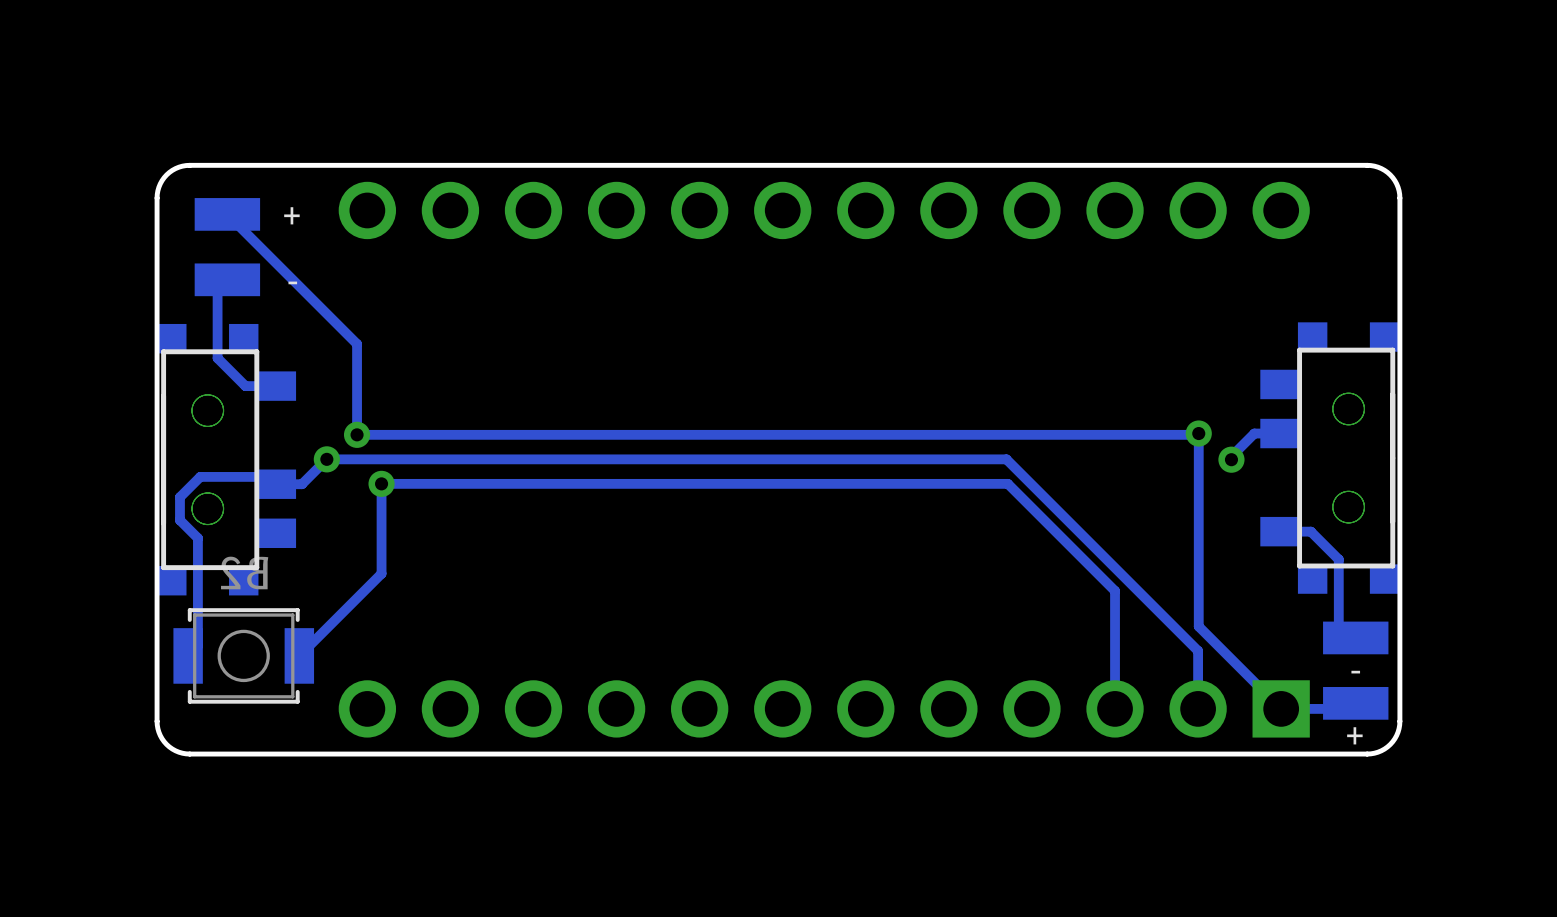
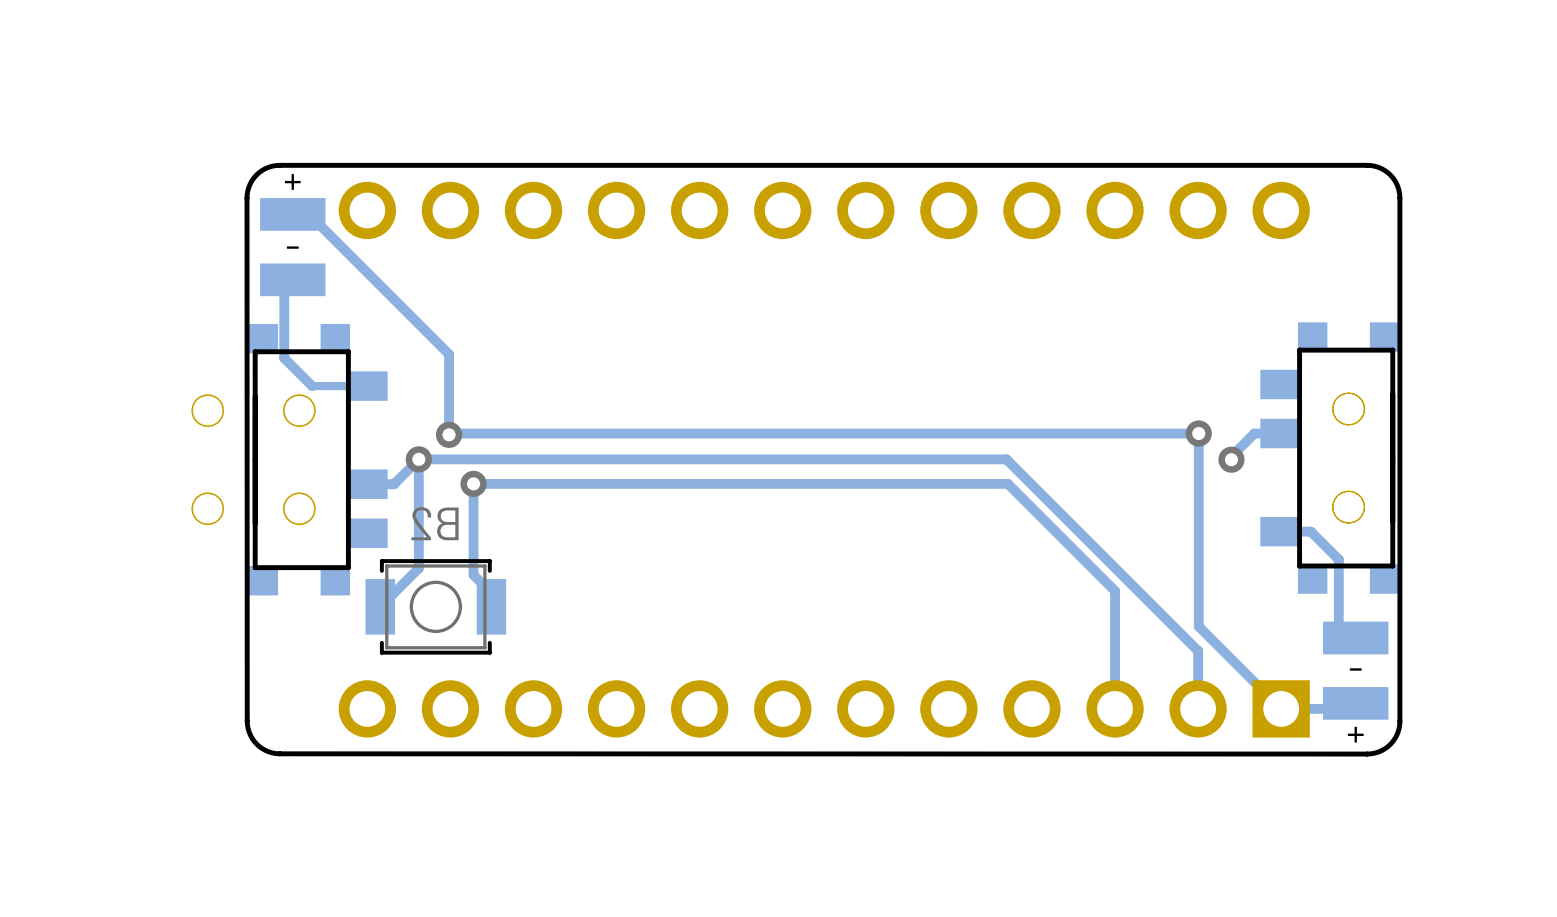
board edge: (279, 165) (182, 166) (166, 174) (157, 190) (157, 721) (162, 738) (175, 750) (189, 754) (1367, 754) -> (279, 165) (265, 168) (256, 174) (248, 187) (247, 198) (247, 721) (252, 738) (265, 750) (279, 753) (1367, 754)
track: (227, 214) (357, 344) (357, 434) (1197, 434) -> none
part: (227, 214) -> none
track: none -> (292, 214) (309, 214) (449, 354) (449, 434) (1198, 433)
part: none -> (292, 214)
track: (227, 279) (217, 289) (217, 358) (245, 386) (275, 386) -> none
part: (227, 279) -> none
part: none -> (292, 279)
track: none -> (284, 289) (284, 358) (312, 386) (367, 386)
via: (357, 434) -> none
via: none -> (449, 434)
part position: (226, 459) -> (318, 459)
via: (326, 459) -> none
track: (418, 459) (326, 459) (301, 484) (275, 484) (268, 476) (200, 476) (179, 497) (179, 520) (197, 538) (197, 646) (188, 655) -> none
via: none -> (418, 459)
track: none -> (360, 476) (367, 484) (393, 484) (418, 459) (418, 568) (380, 606)
via: (381, 483) -> none
track: (473, 483) (381, 483) (381, 573) (299, 655) -> (473, 483) (473, 575) (491, 592) (491, 606)
via: none -> (473, 483)
part position: (243, 655) -> (435, 606)

